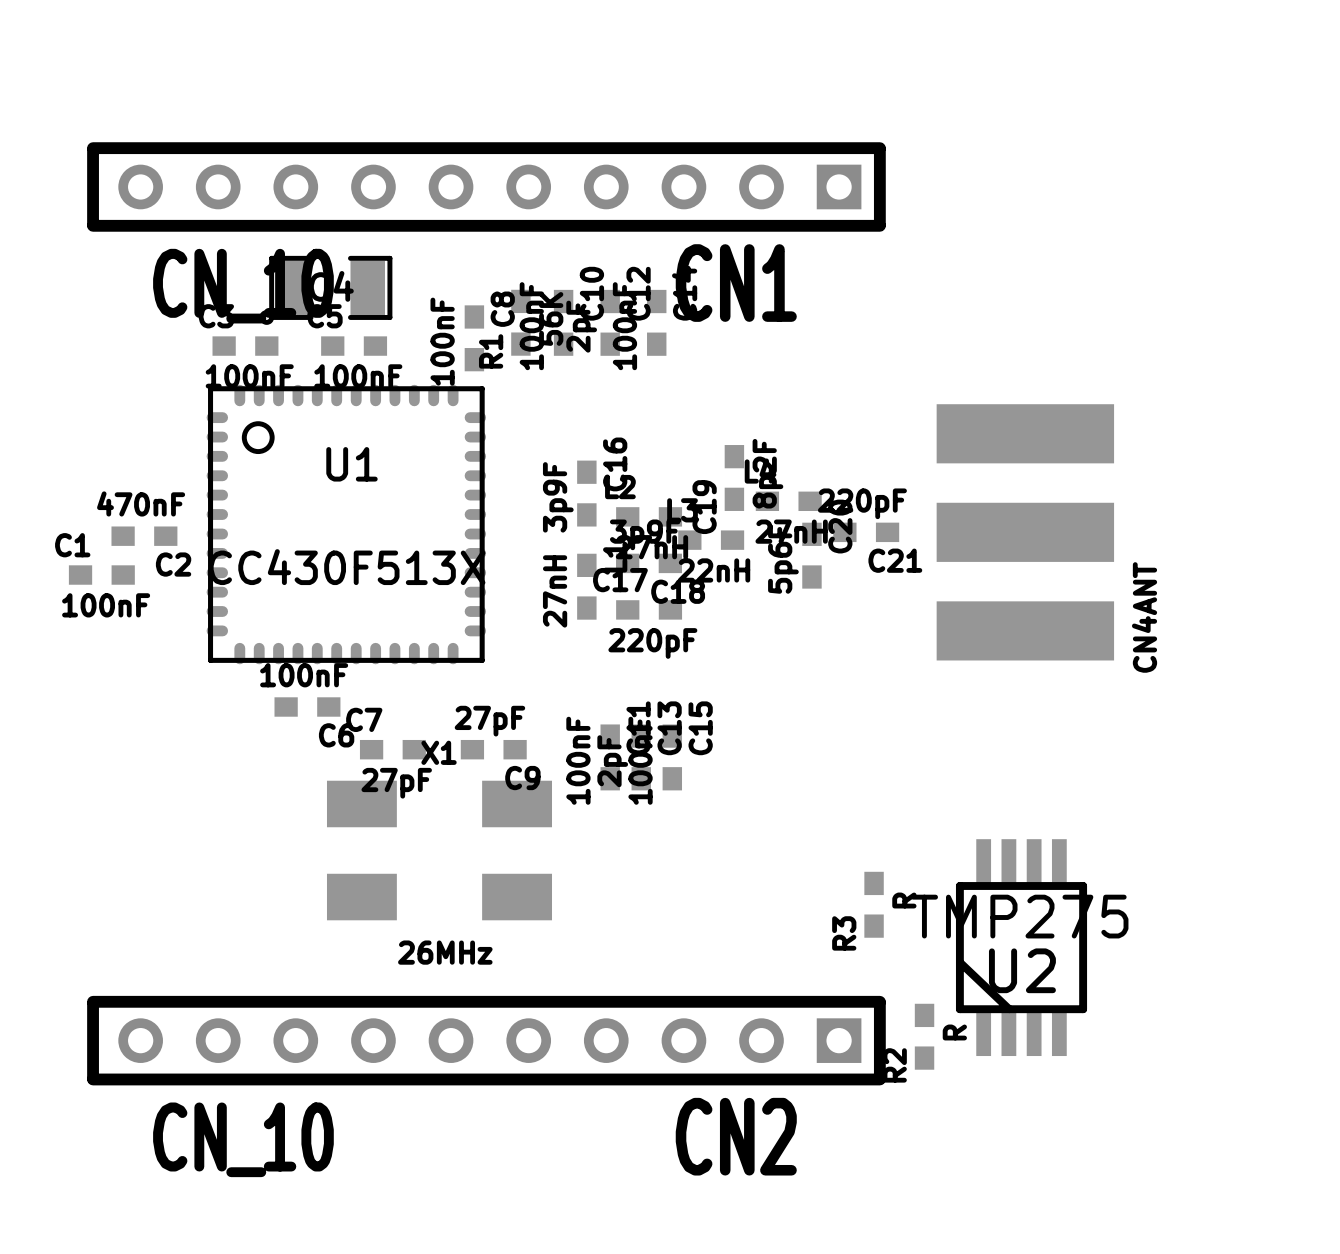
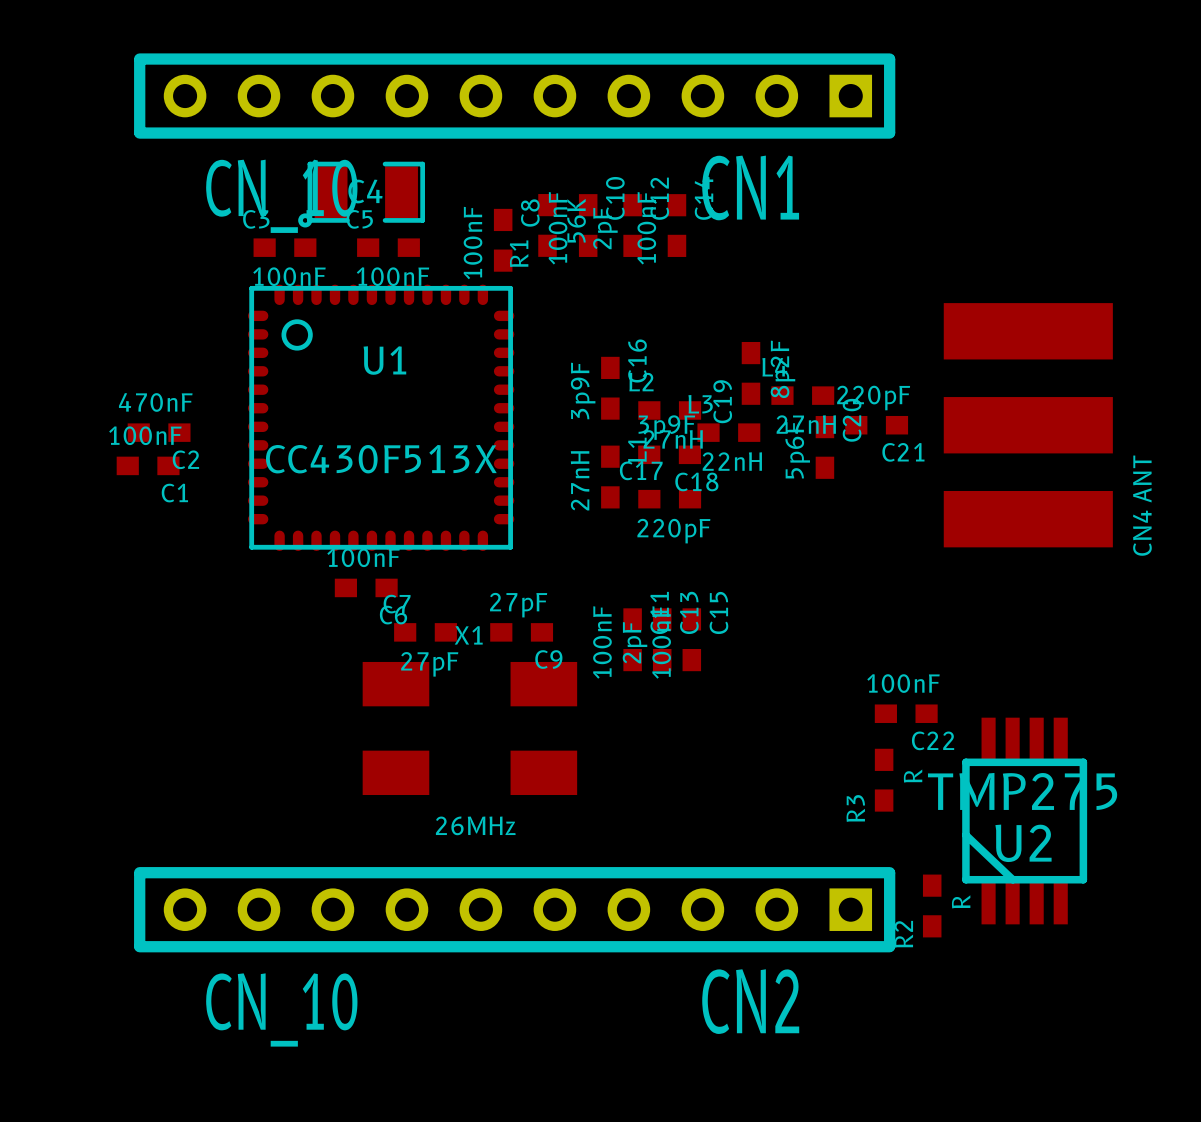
C2 position: (144, 536) -> (159, 432)
C1 name position: C1 (72, 545) -> C1 (174, 493)
C1 value position: 100nF (106, 605) -> 100nF (145, 435)
C6 position: (307, 707) -> (366, 587)
C22: none -> 100nF (906, 713)

